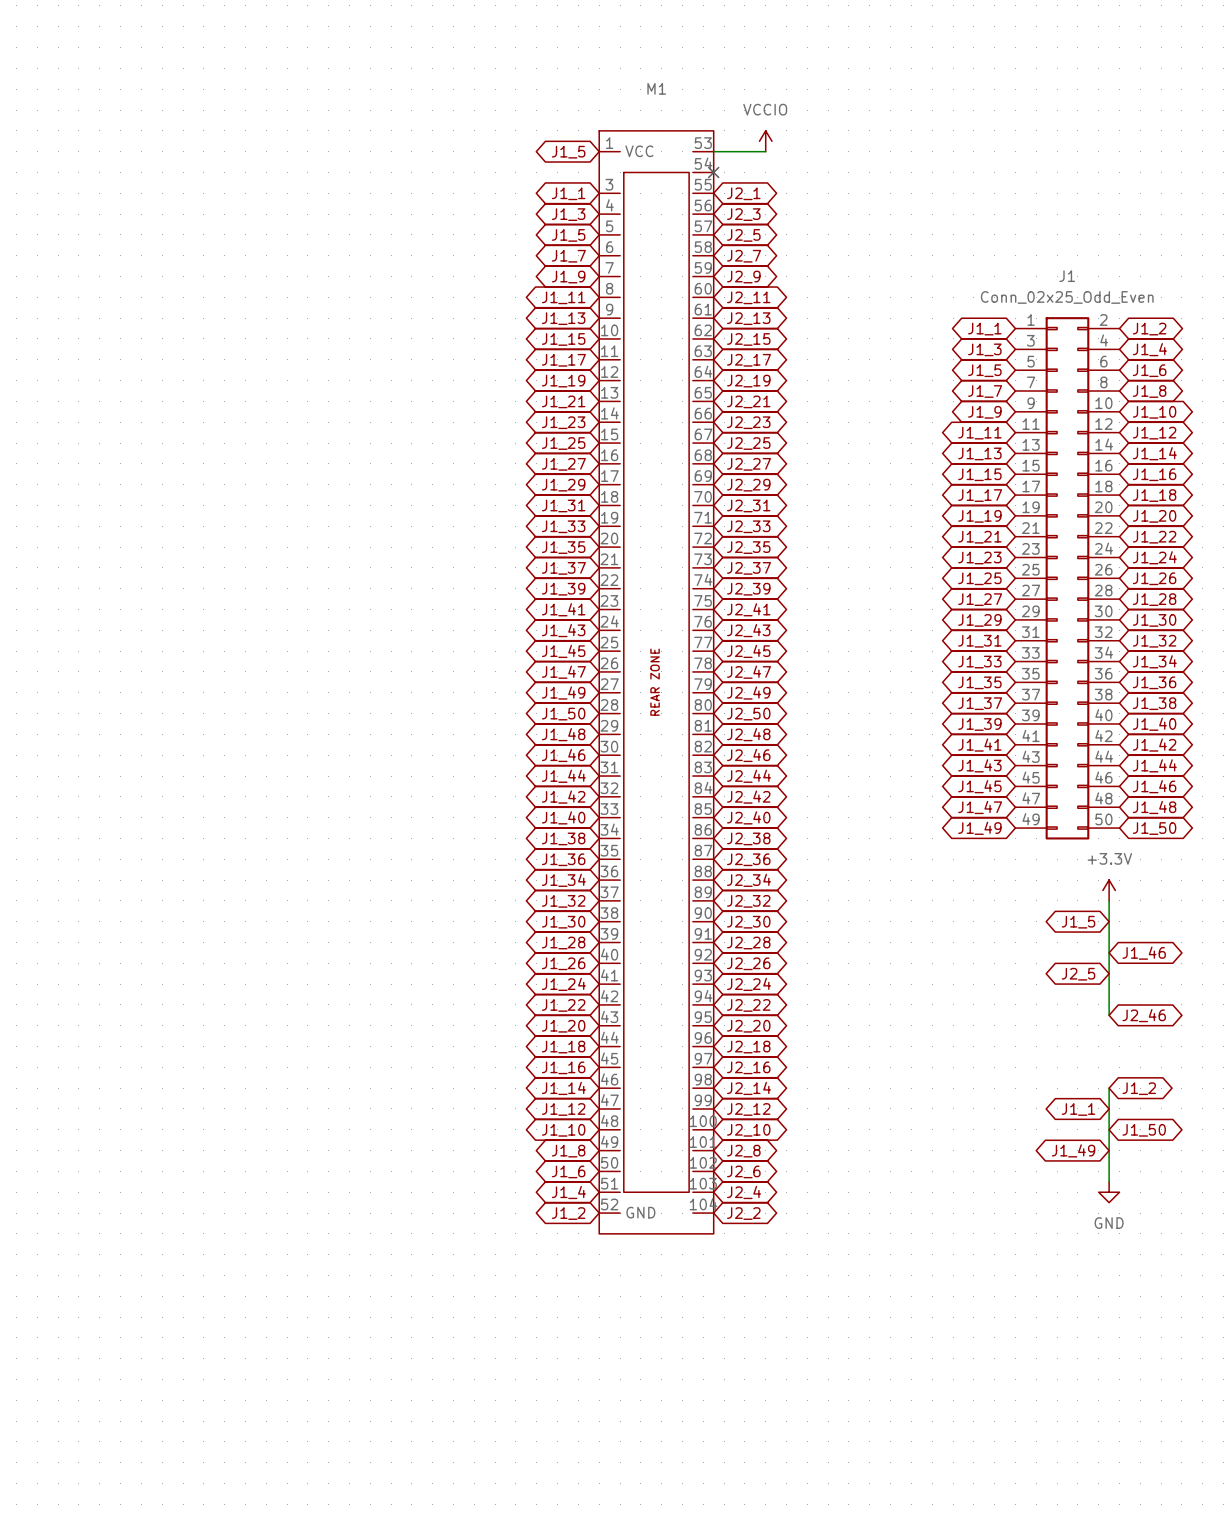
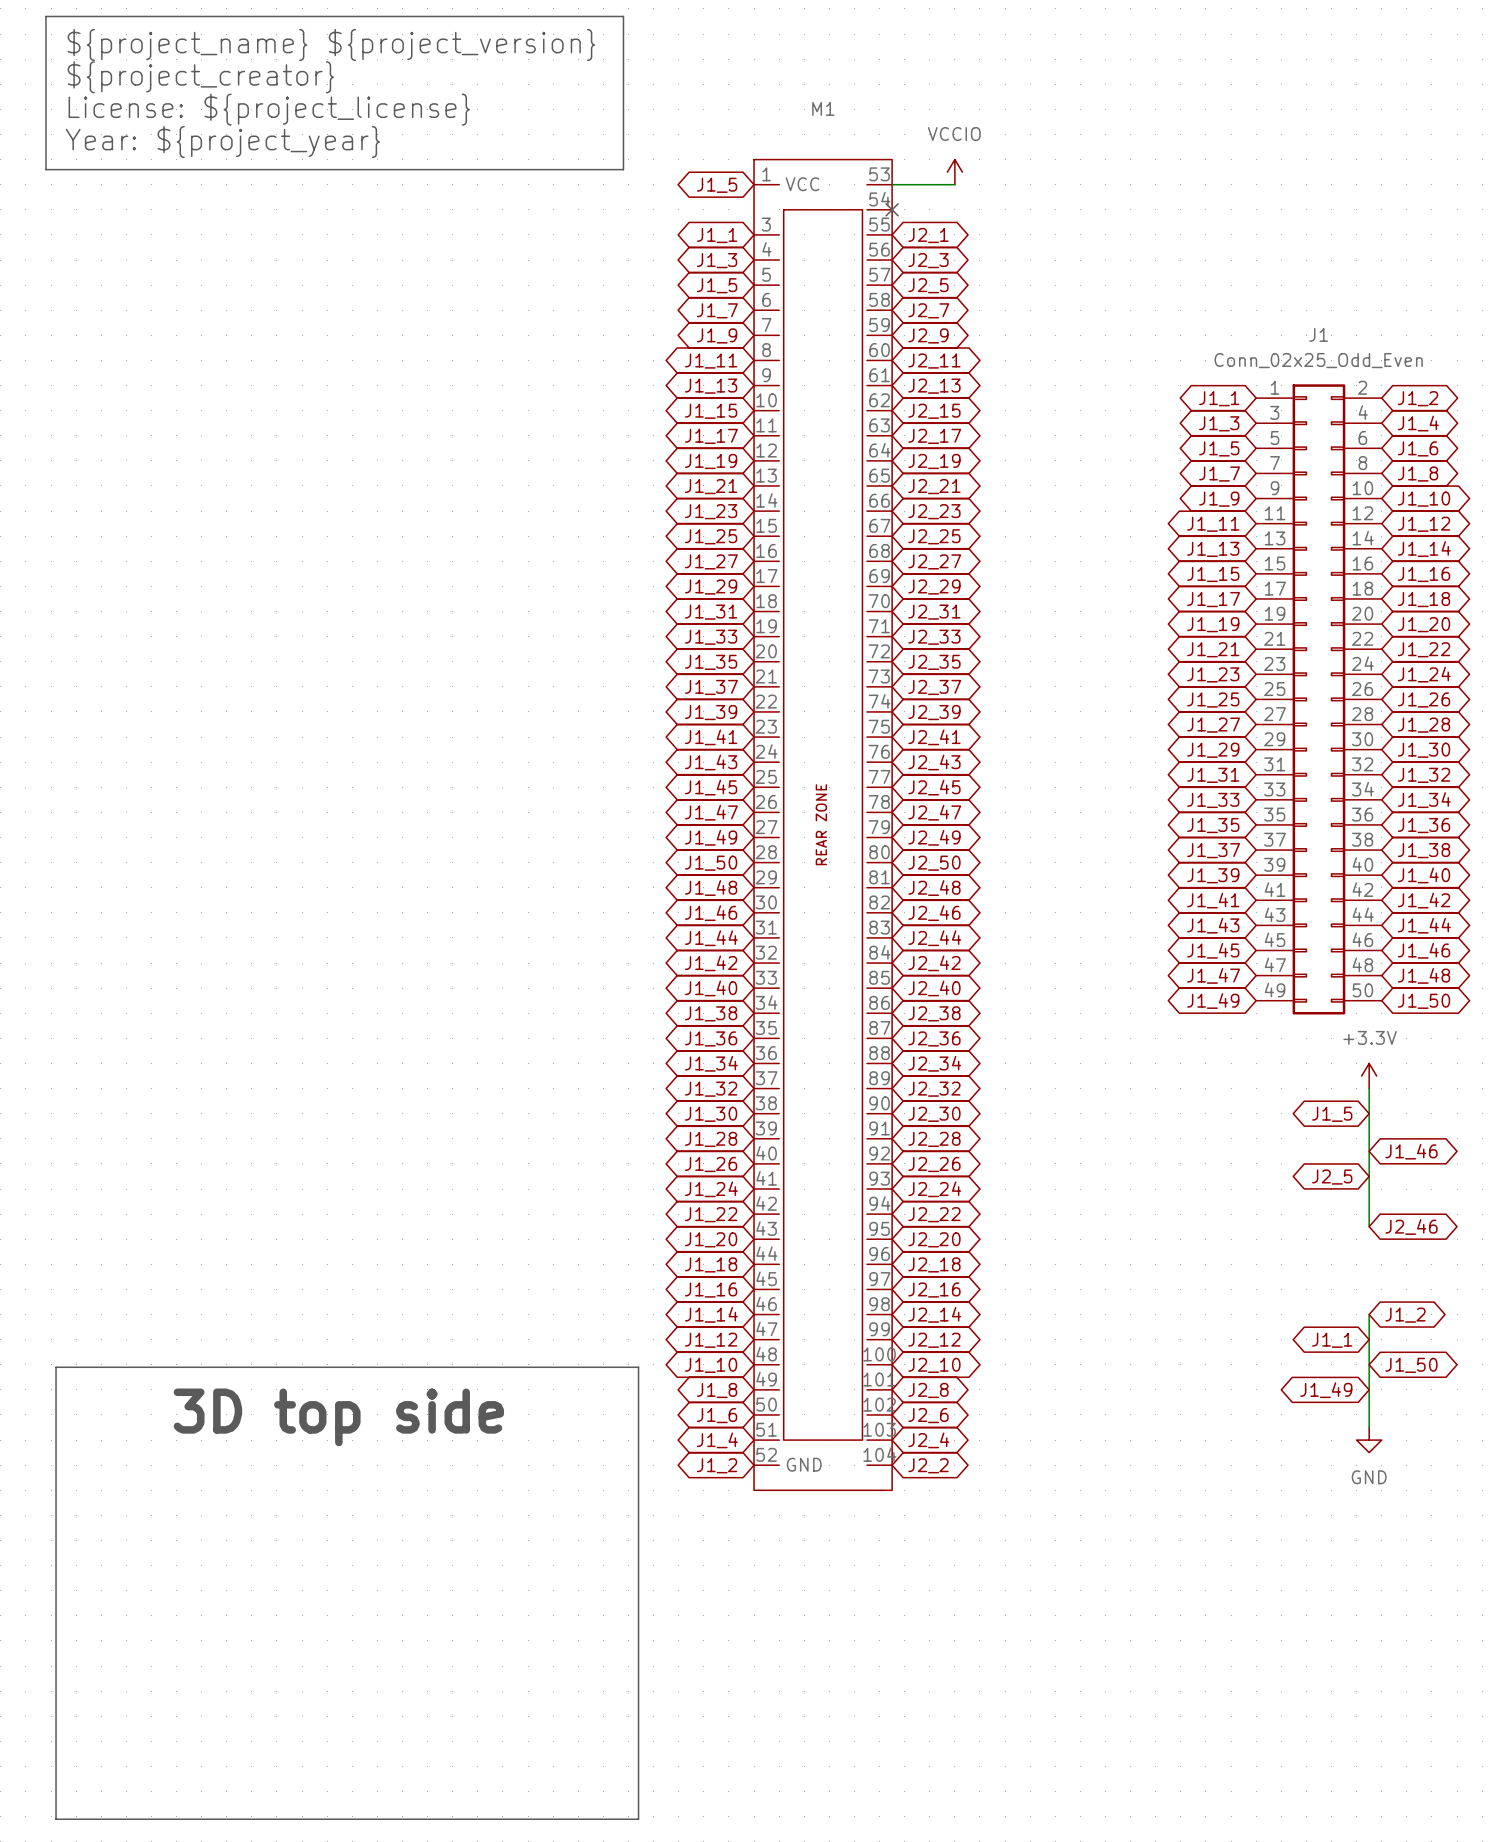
line: none -> (45, 16) (623, 16) (623, 169) (45, 169) (45, 16)
text: none -> ${project_name} ${project_version} (331, 44)
text: none -> ${project_creator} (200, 77)
text: none -> License: ${project_license} (269, 109)
text: none -> Year: ${project_year} (222, 141)
line: none -> (56, 1367) (638, 1367) (638, 1819) (56, 1819) (56, 1367)
text: none -> 3D top side (338, 1417)

